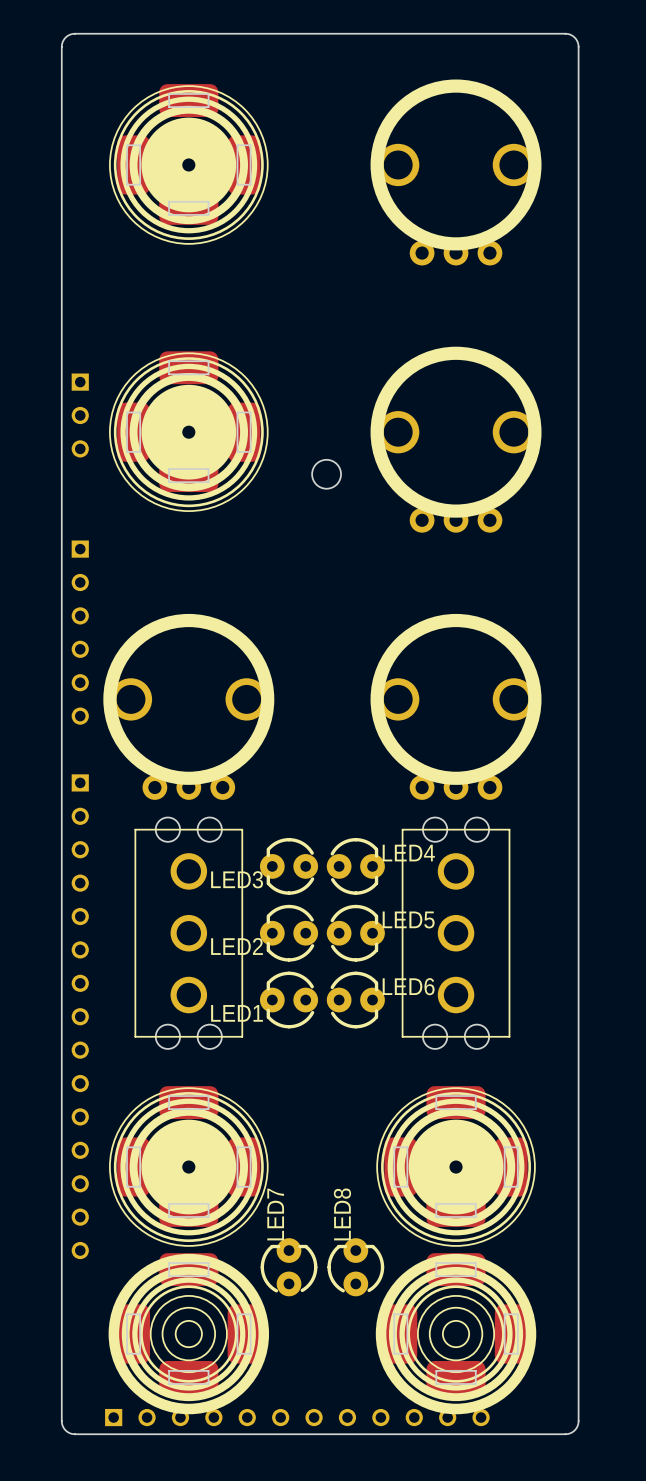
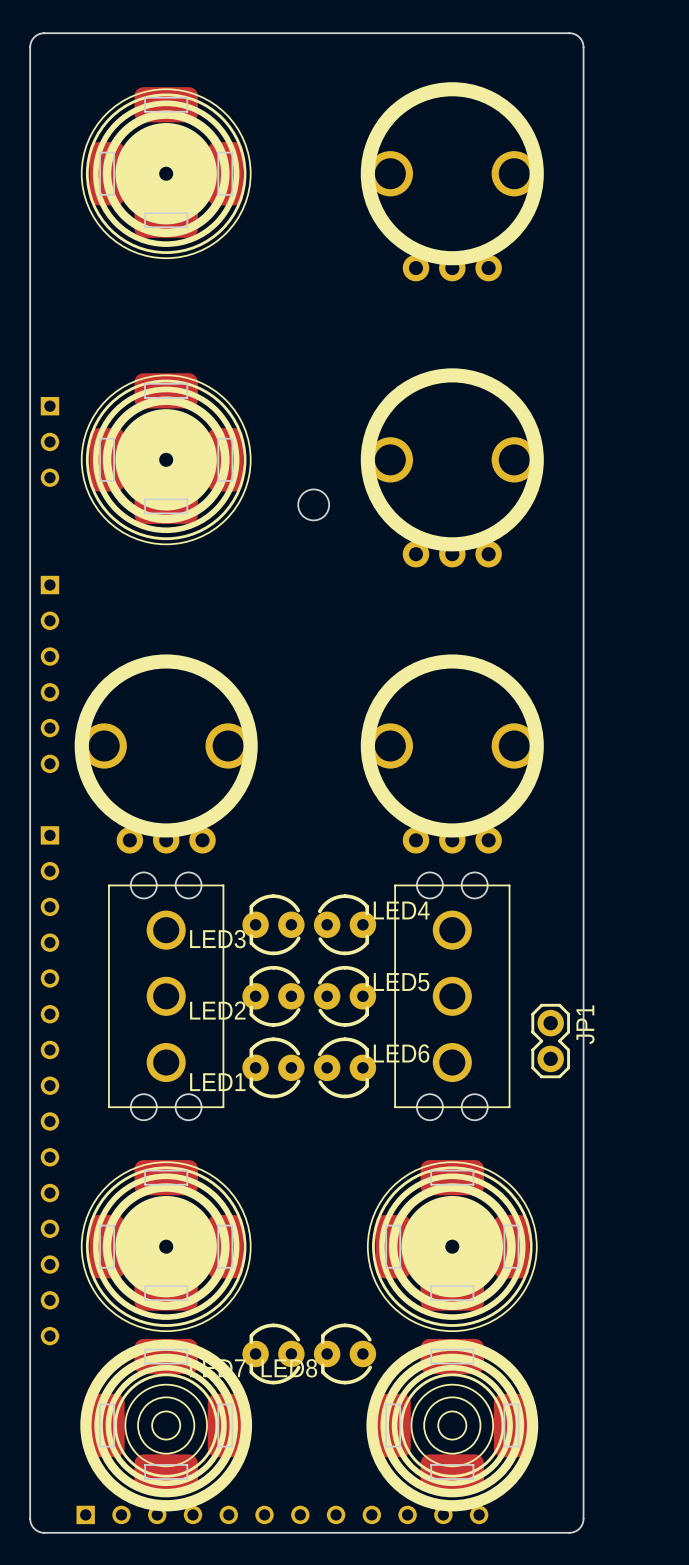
JP1: none -> (550, 1041)
LED7 rotation: 0° (289, 1267) -> 90° counterclockwise (273, 1353)
LED8 rotation: 0° (355, 1267) -> 90° counterclockwise (345, 1353)

